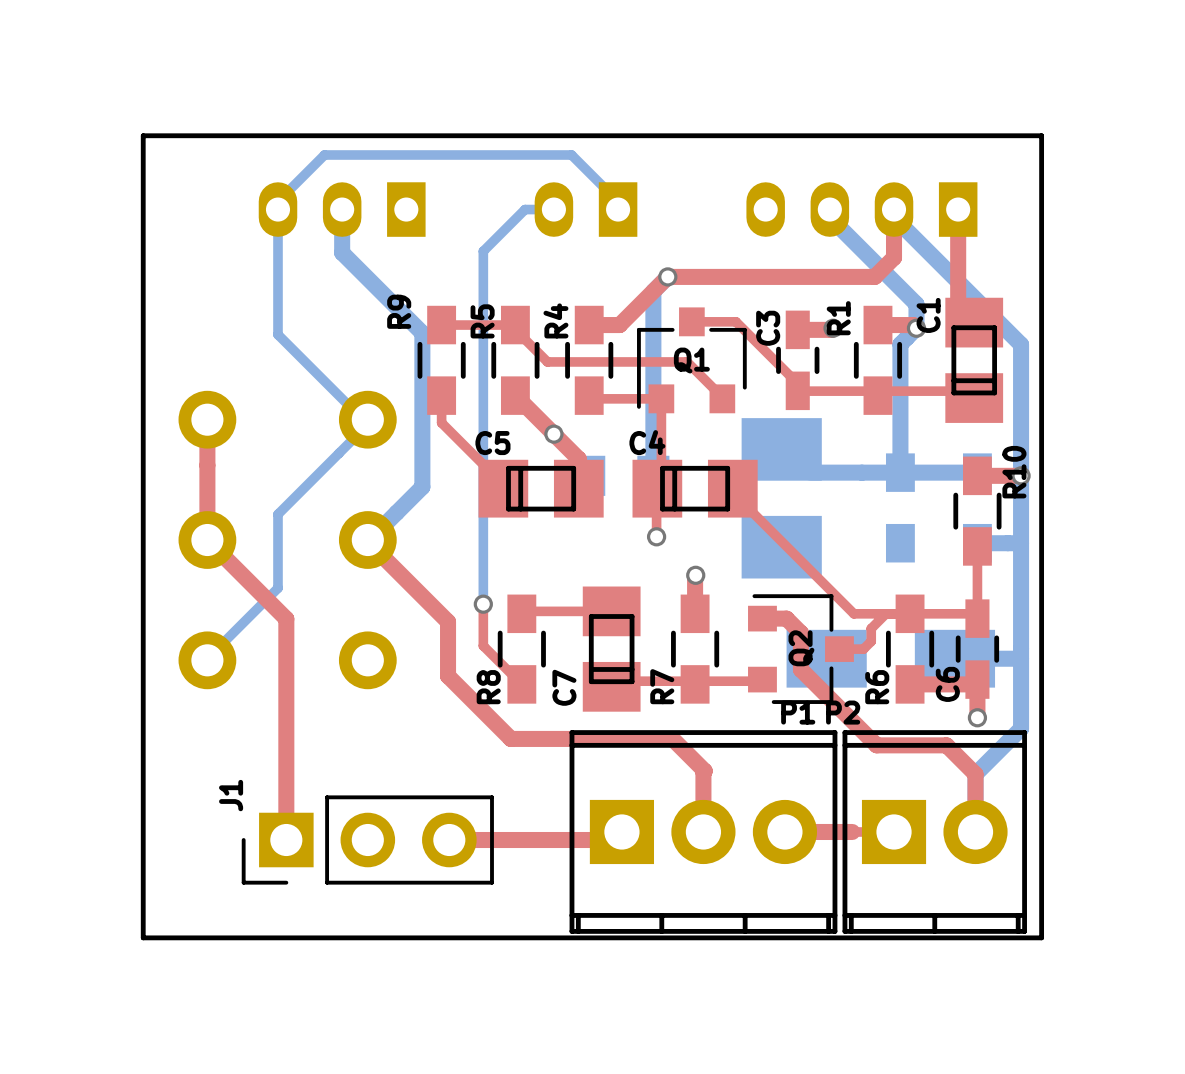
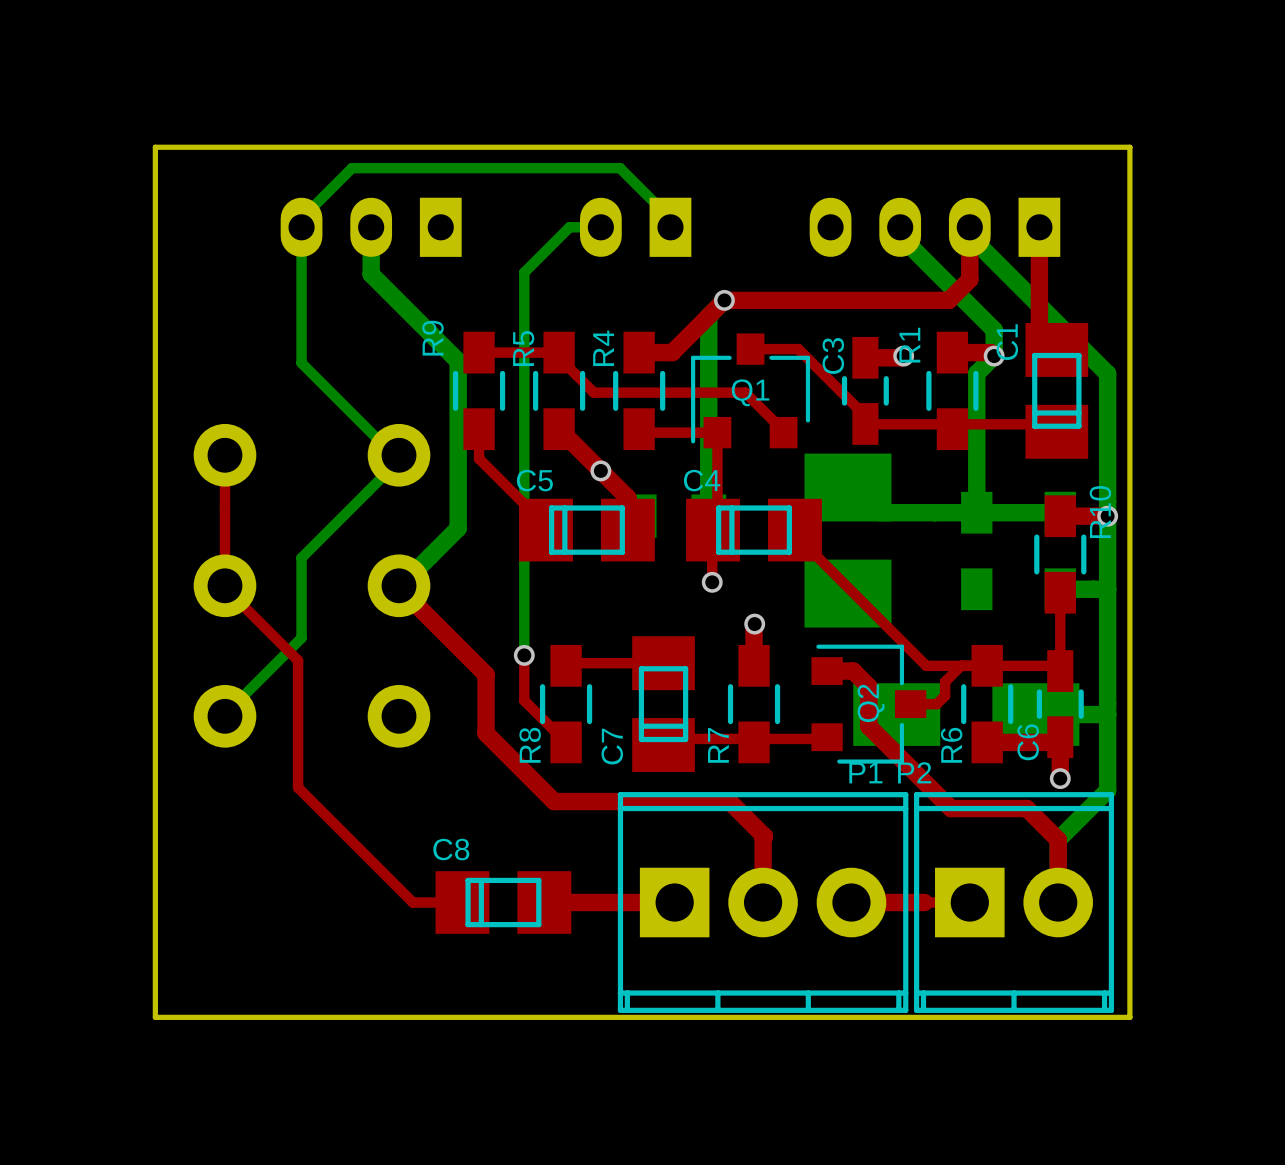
top track width: thick (207, 424) (207, 541) -> thin (224, 460) (224, 587)
top track: (207, 540) (286, 618) (286, 840) -> none
top track: none -> (224, 587) (298, 660) (298, 787) (412, 902) (461, 902)
C8: none -> (503, 902)
top track: (621, 831) (613, 840) (449, 840) -> (674, 902) (544, 902)
J1: (367, 840) -> none

